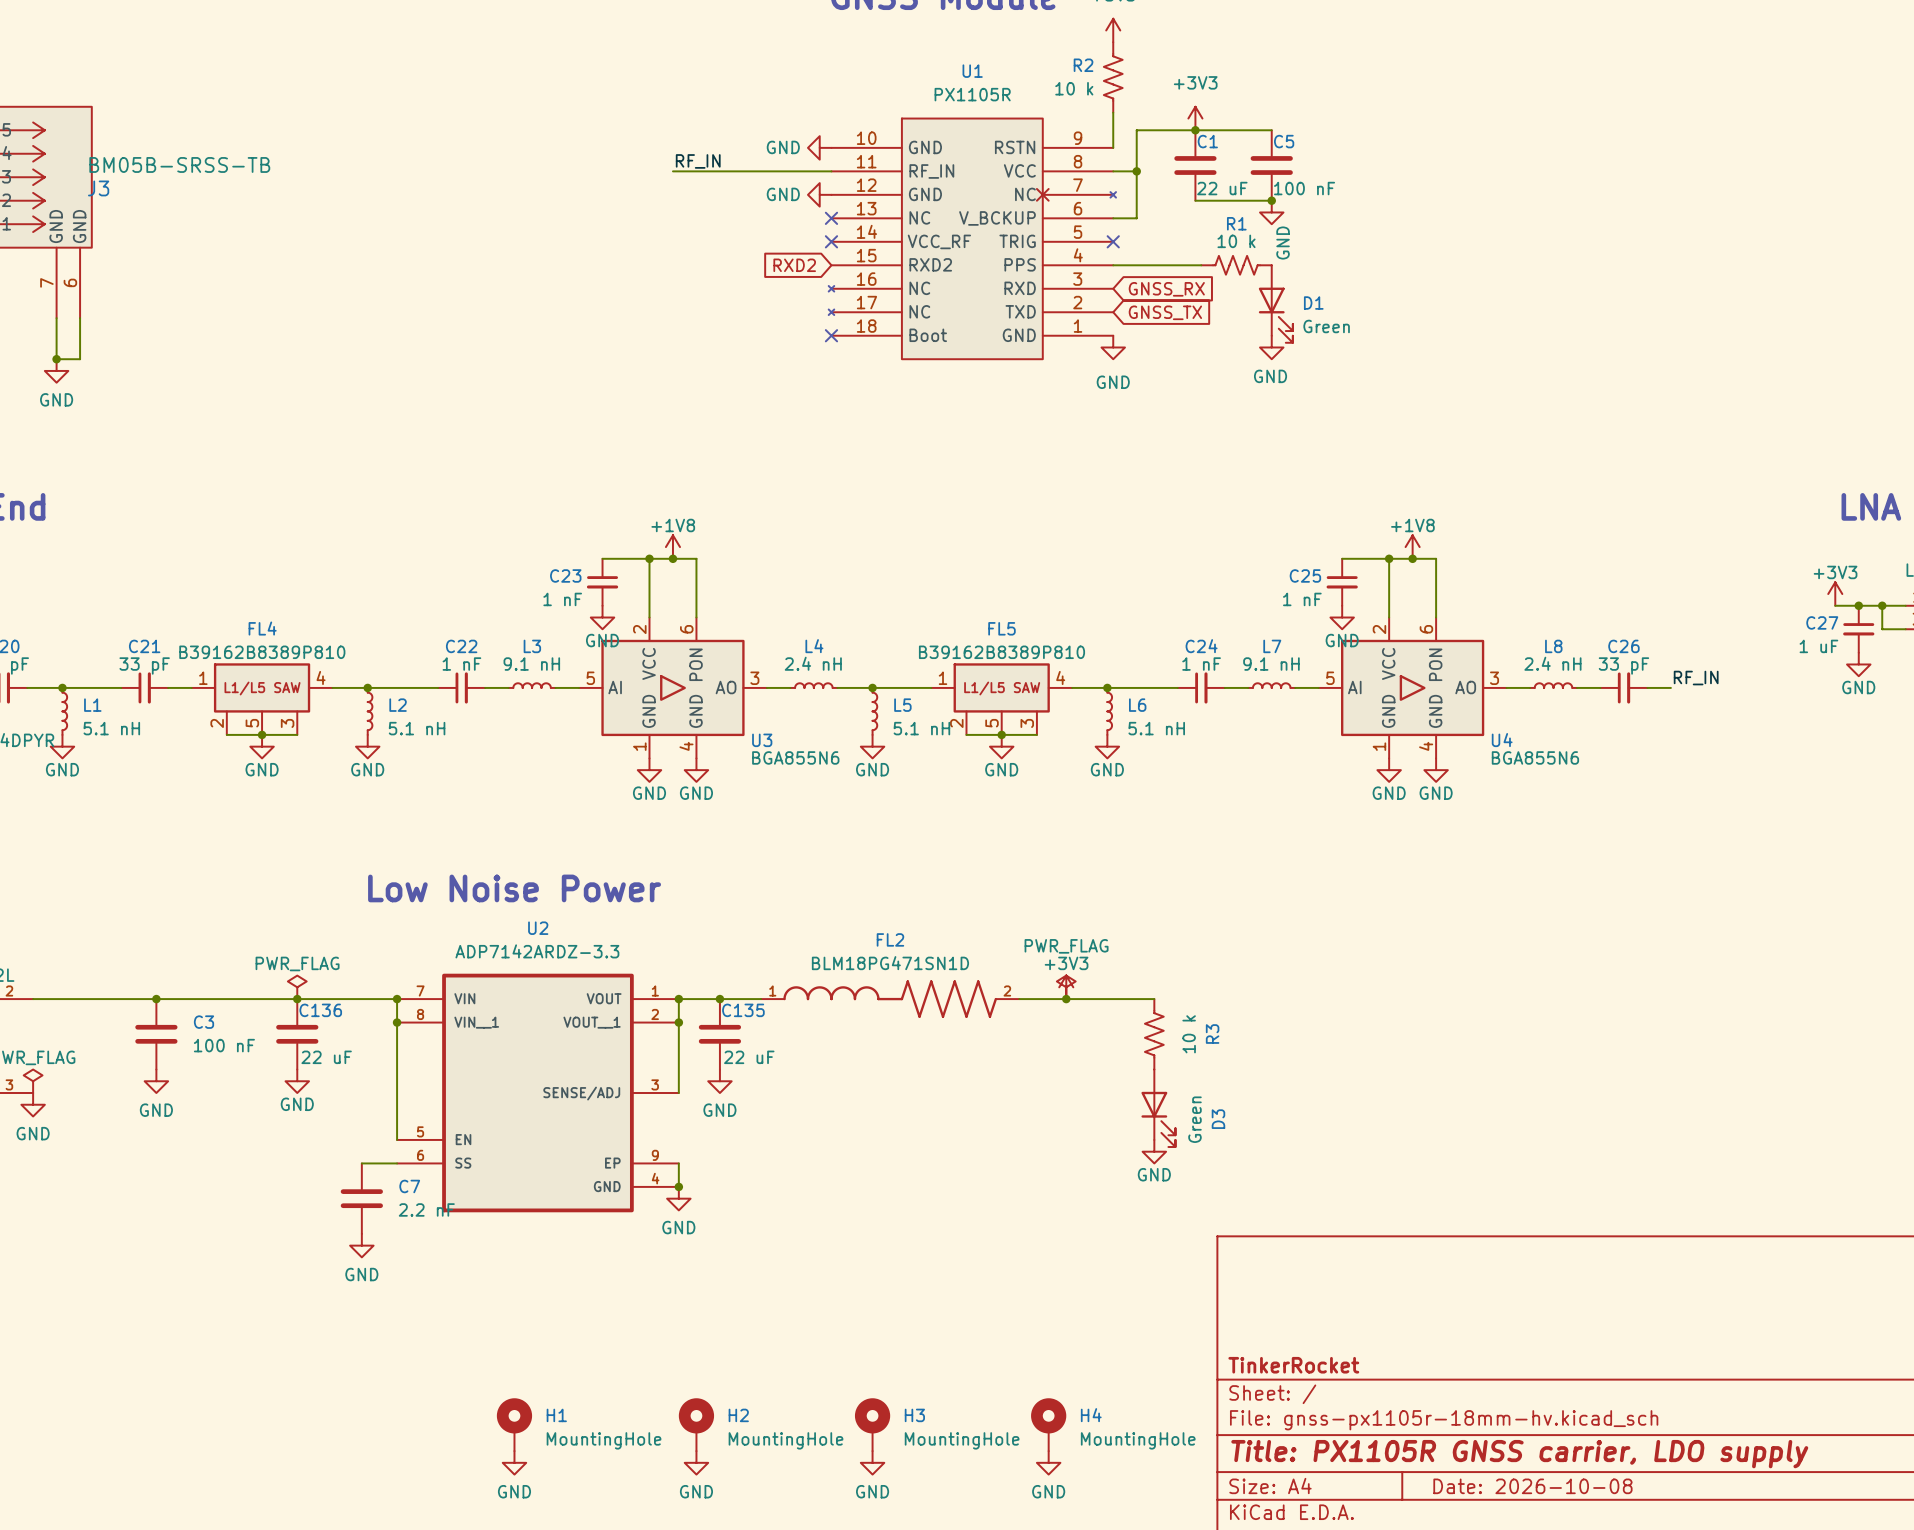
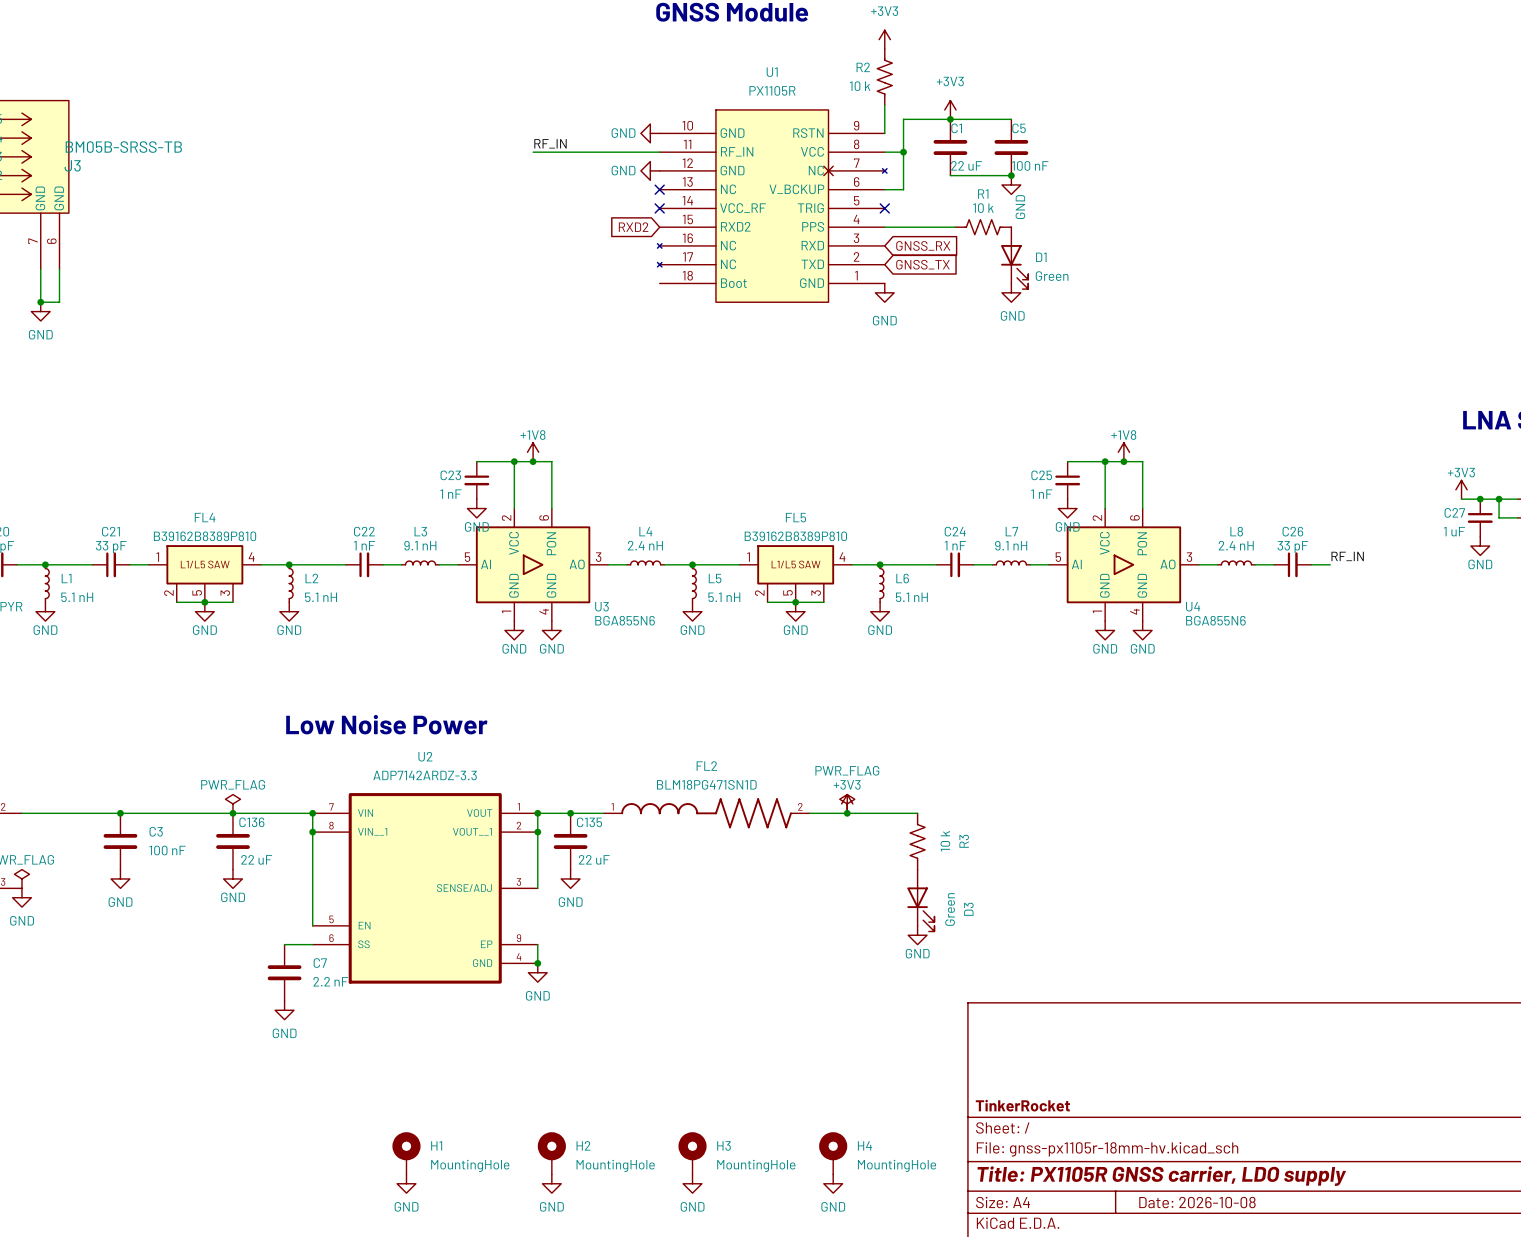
no-connect mark: (831, 335) -> none

